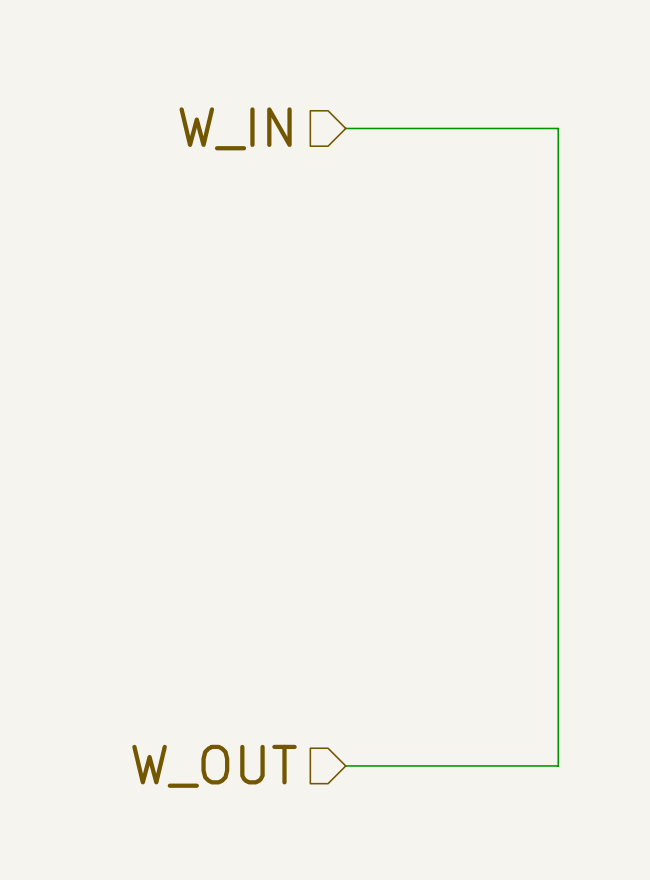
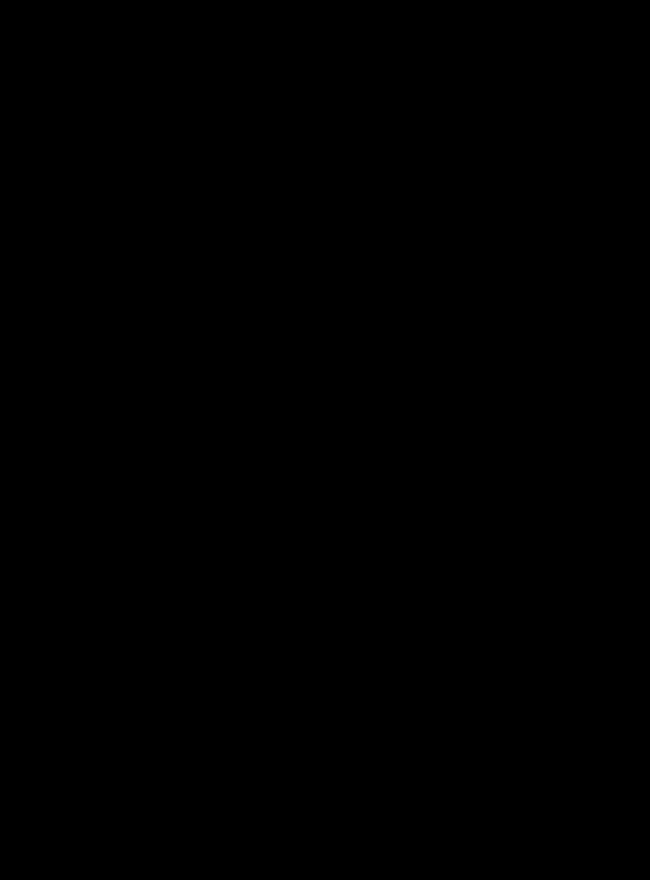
hierarchical label: W_IN (235, 128) -> none
wire: (345, 128) (558, 128) (558, 765) (345, 765) -> none
hierarchical label: W_OUT (214, 766) -> none

